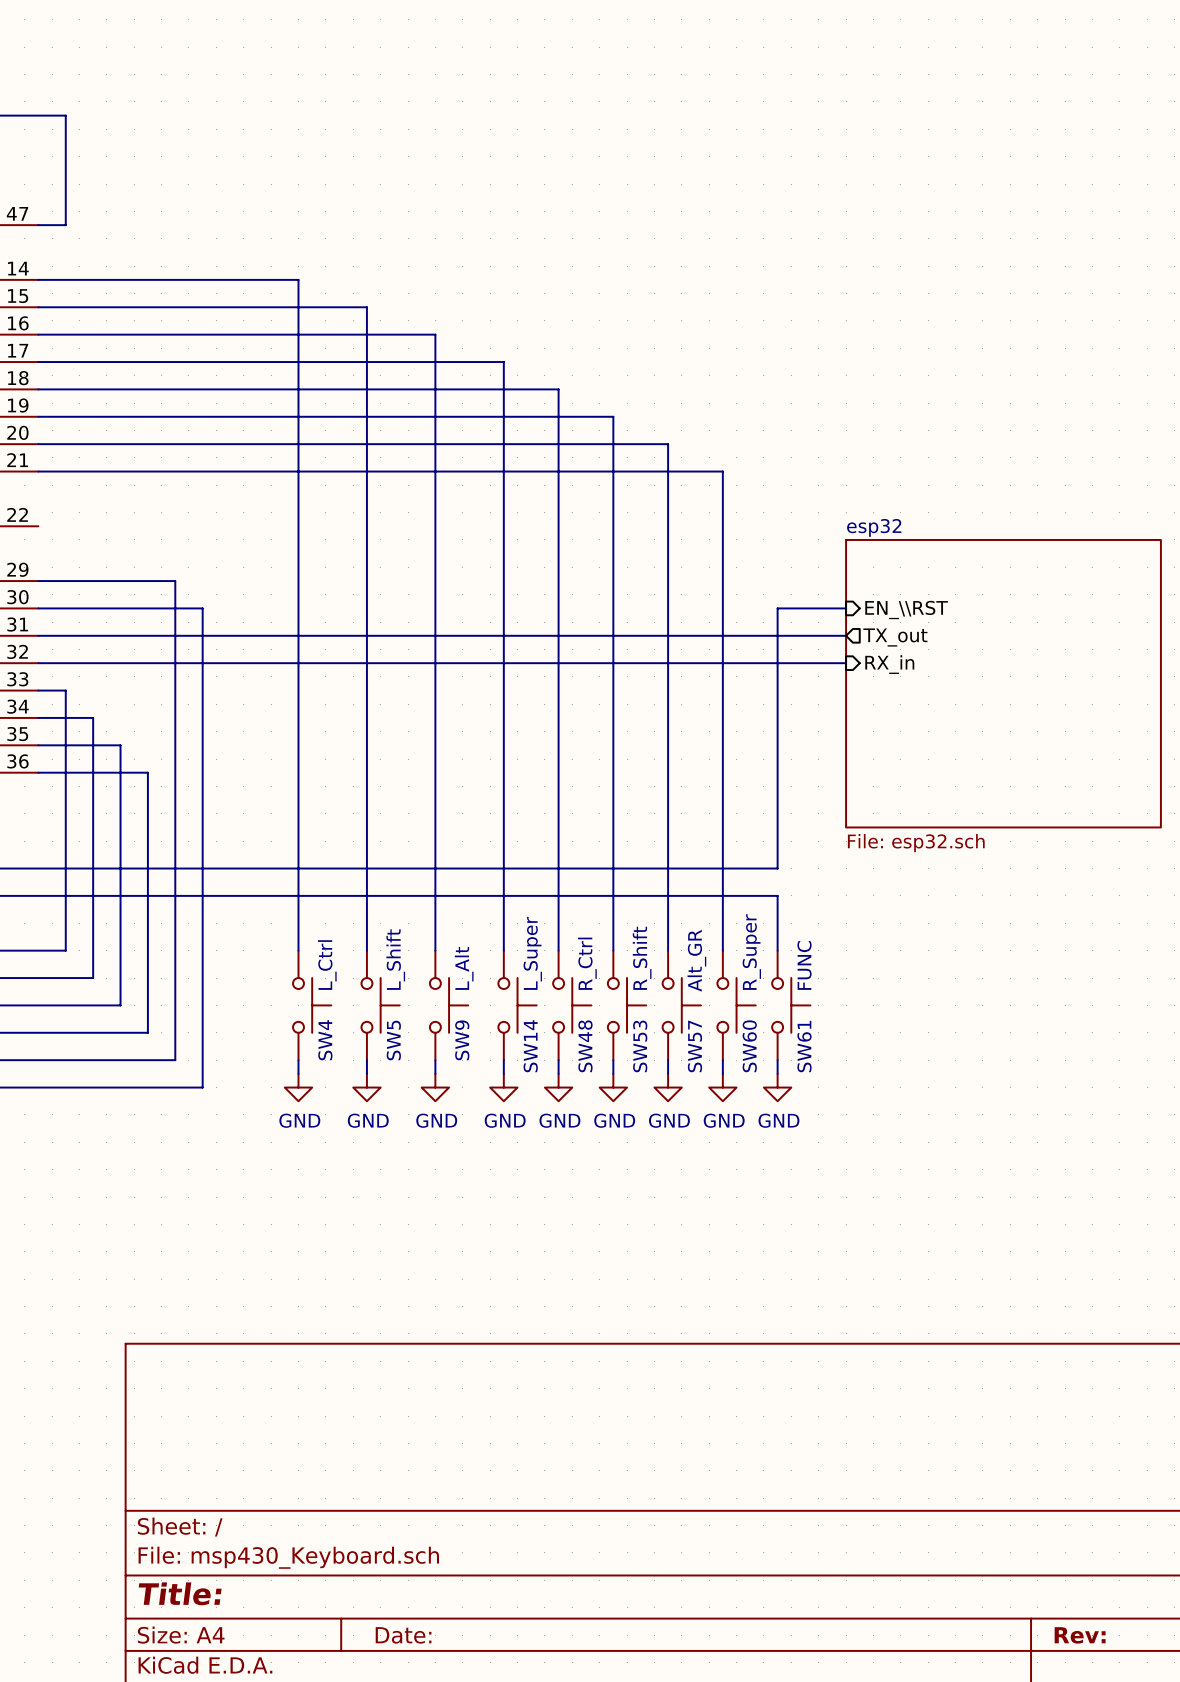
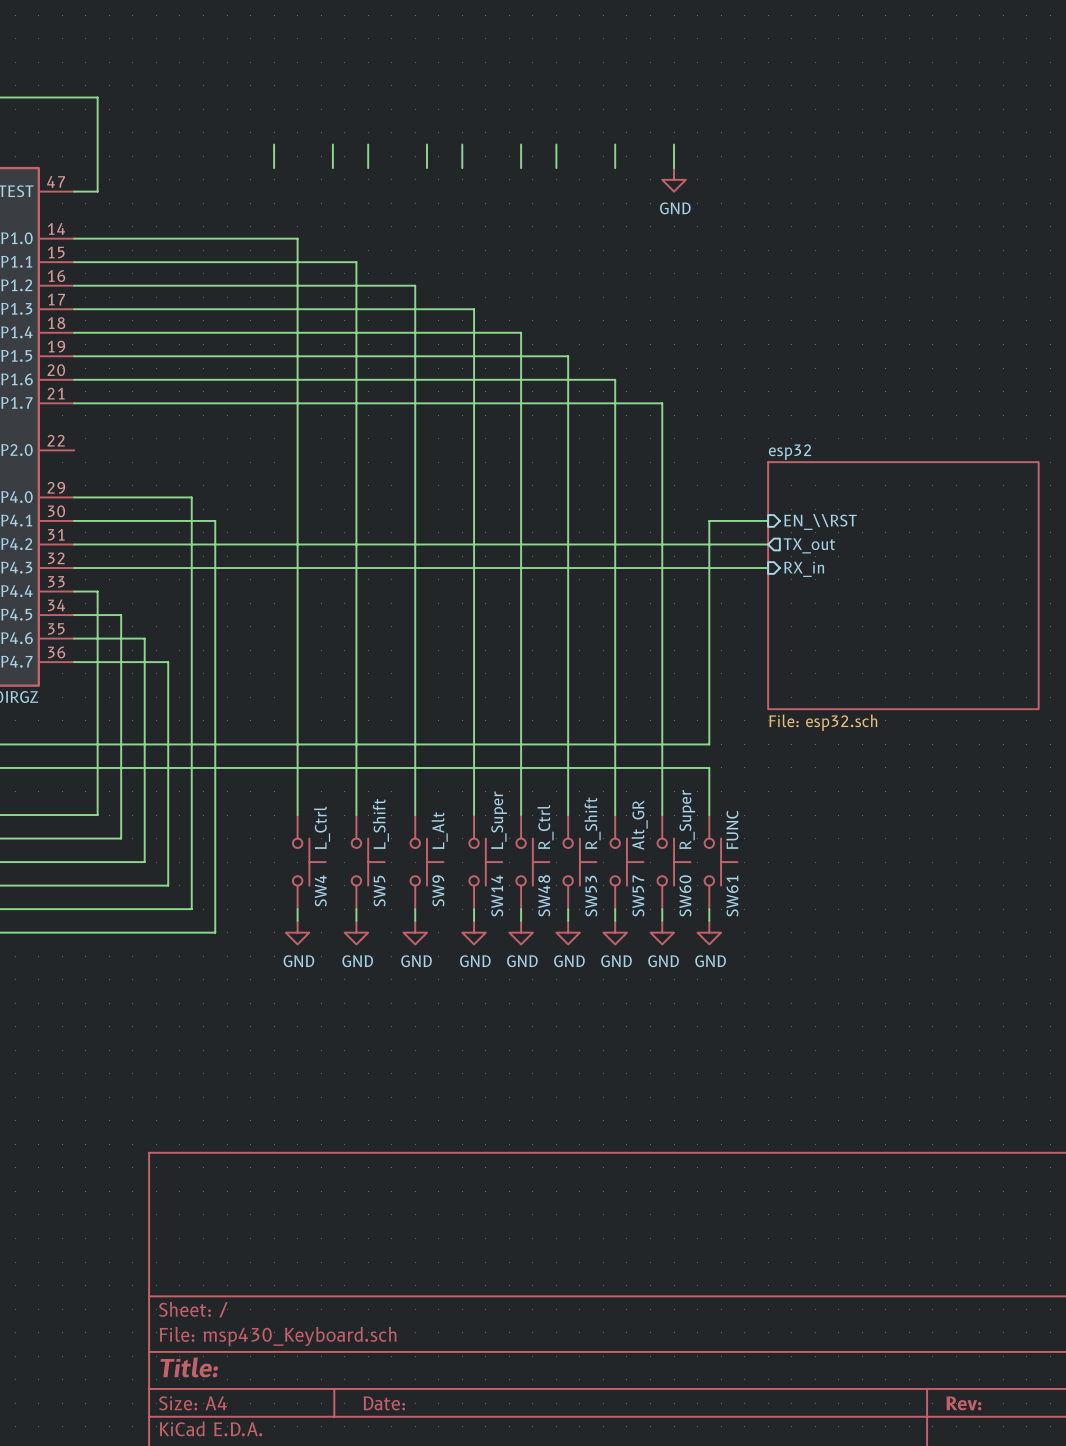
wire: none -> (274, 144) (274, 168)
wire: none -> (332, 144) (332, 168)
wire: none -> (368, 144) (368, 168)
wire: none -> (427, 144) (427, 168)
wire: none -> (462, 144) (462, 168)
wire: none -> (521, 144) (521, 168)
wire: none -> (556, 144) (556, 168)
wire: none -> (615, 144) (615, 168)
wire: none -> (674, 144) (674, 168)
power symbol: none -> GND (674, 179)

